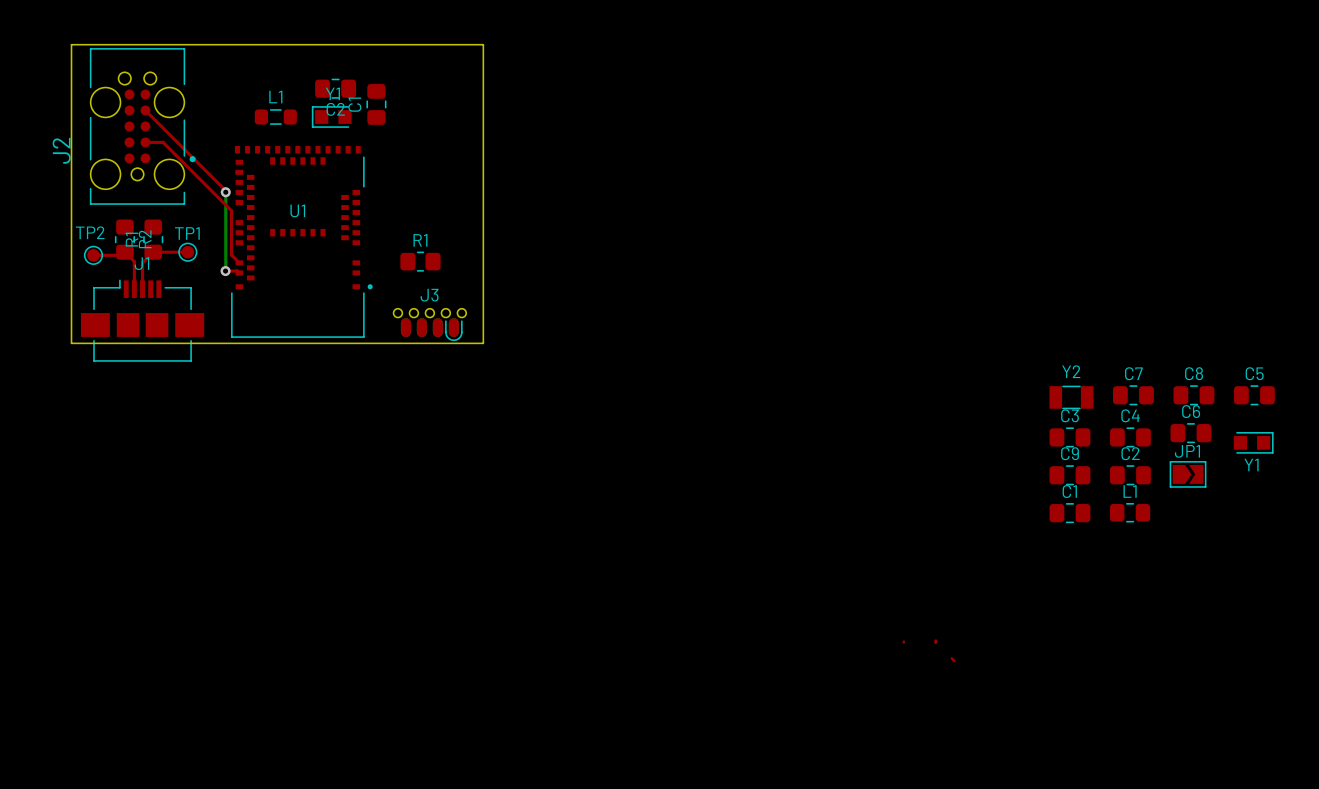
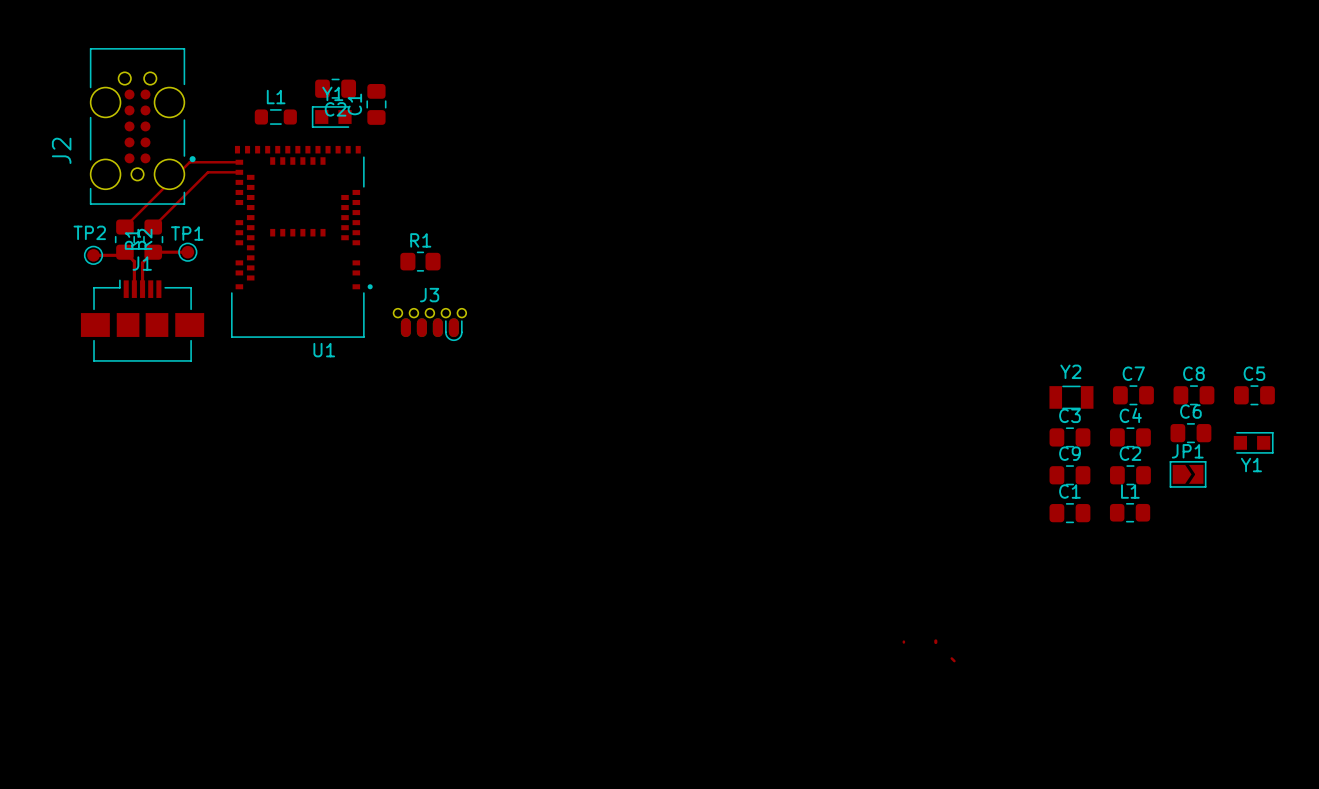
board edge: (71, 44) (483, 44) (483, 343) (71, 343) (71, 44) -> none
top track: (145, 110) (225, 192) -> none
top track: (145, 142) (163, 142) (231, 210) (231, 255) (239, 262) -> none
top track: none -> (239, 162) (189, 162) (124, 227)
top track: none -> (236, 172) (207, 172) (153, 227)
bottom track: (225, 192) (225, 271) -> none
via: (225, 192) -> none
U1 name position: U1 (297, 210) -> U1 (324, 350)
top track: (225, 271) (237, 271) (238, 274) -> none
via: (225, 271) -> none

